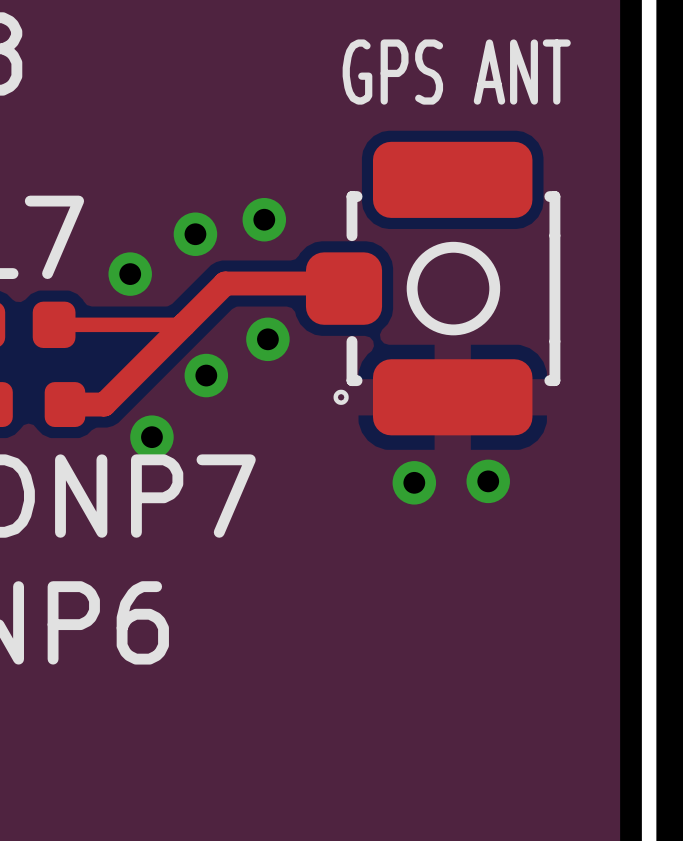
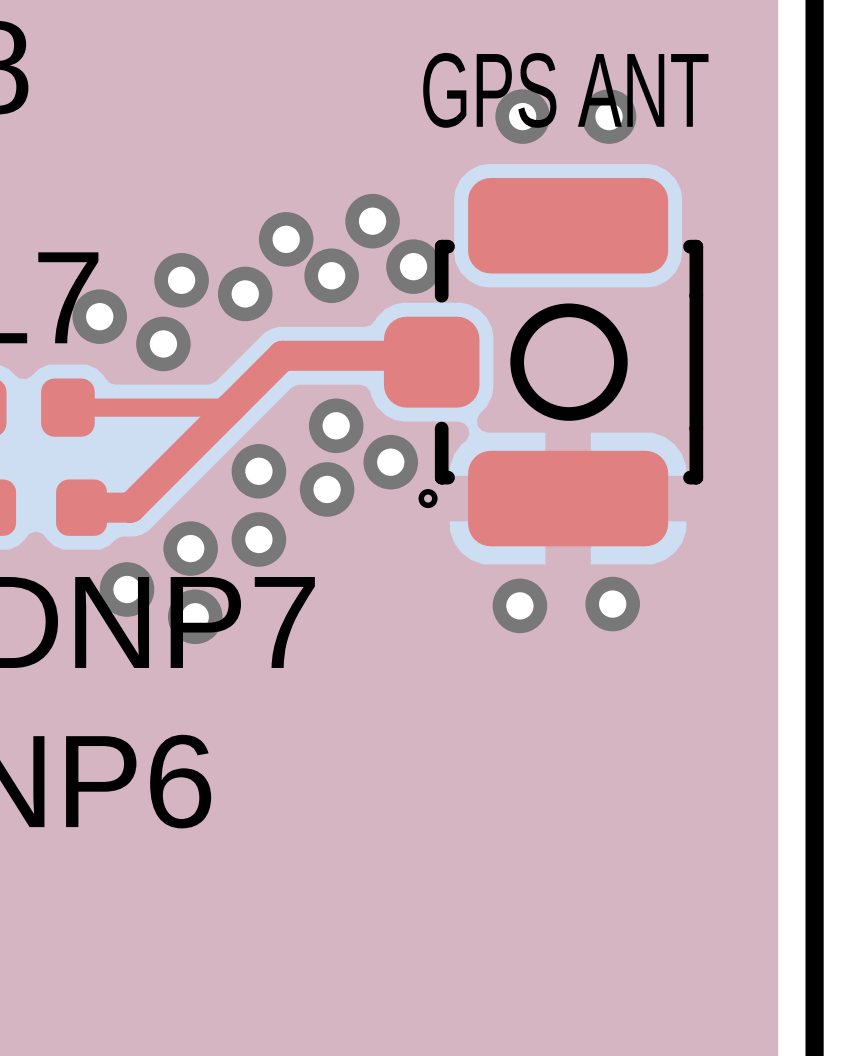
via: none -> (522, 116)
via: none -> (609, 116)
via: none -> (372, 221)
via: none -> (286, 239)
via: none -> (413, 266)
via: none -> (181, 280)
via: none -> (99, 316)
via: none -> (390, 462)
via: none -> (327, 489)
via: none -> (258, 539)
via: none -> (127, 589)
via: none -> (195, 616)

